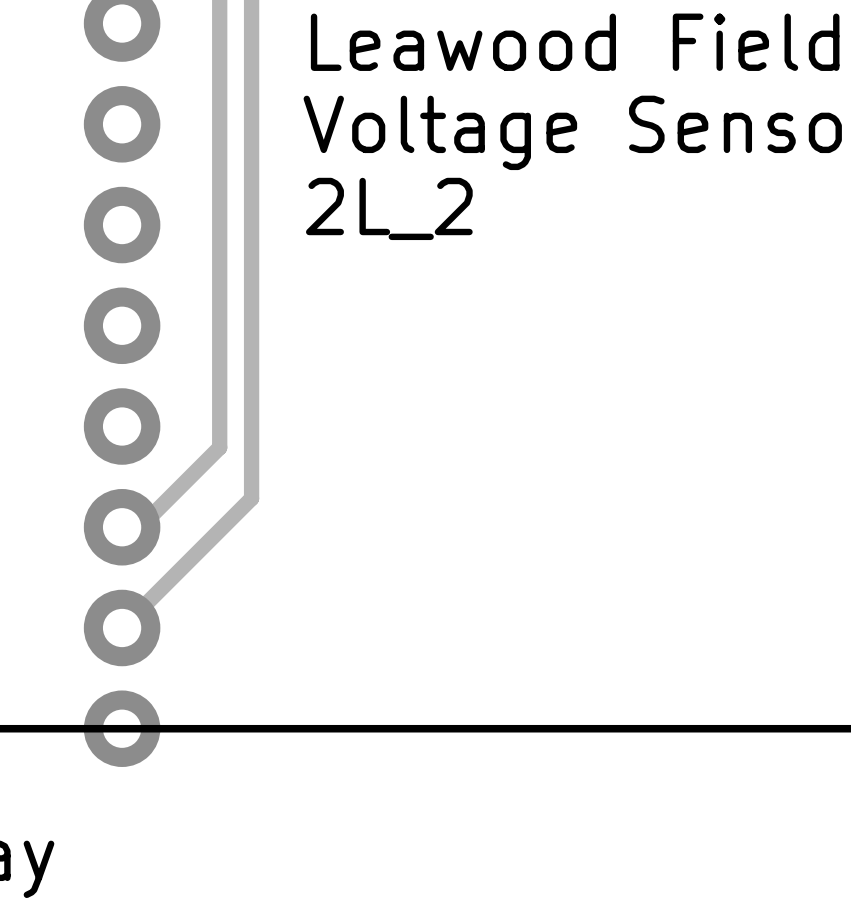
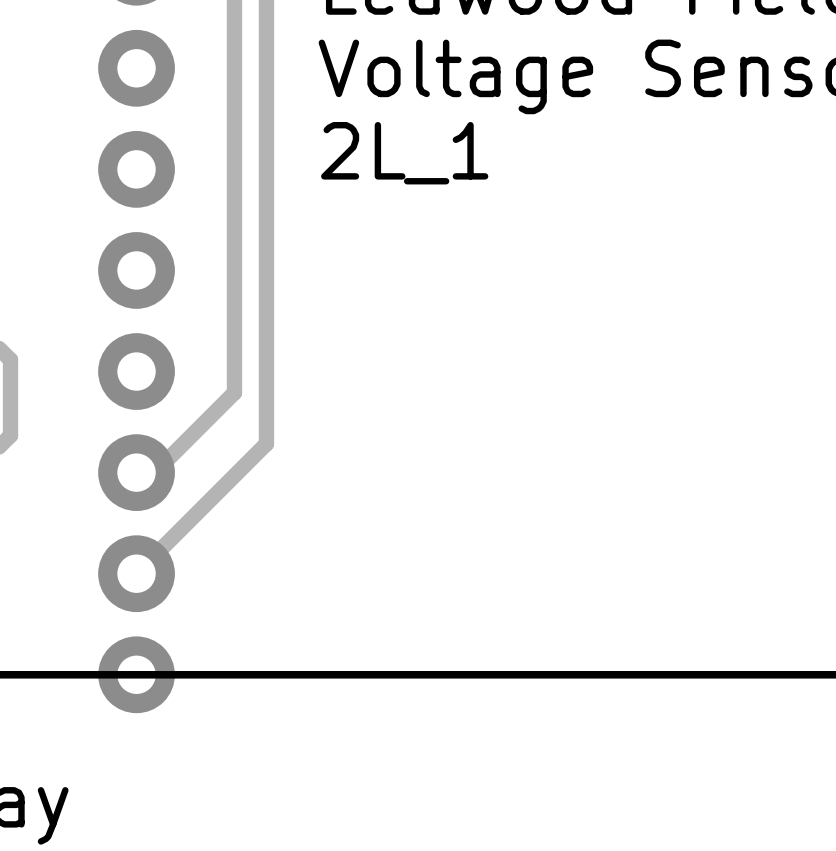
text: 2L_2 (389, 208) -> 2L_1 (404, 153)

